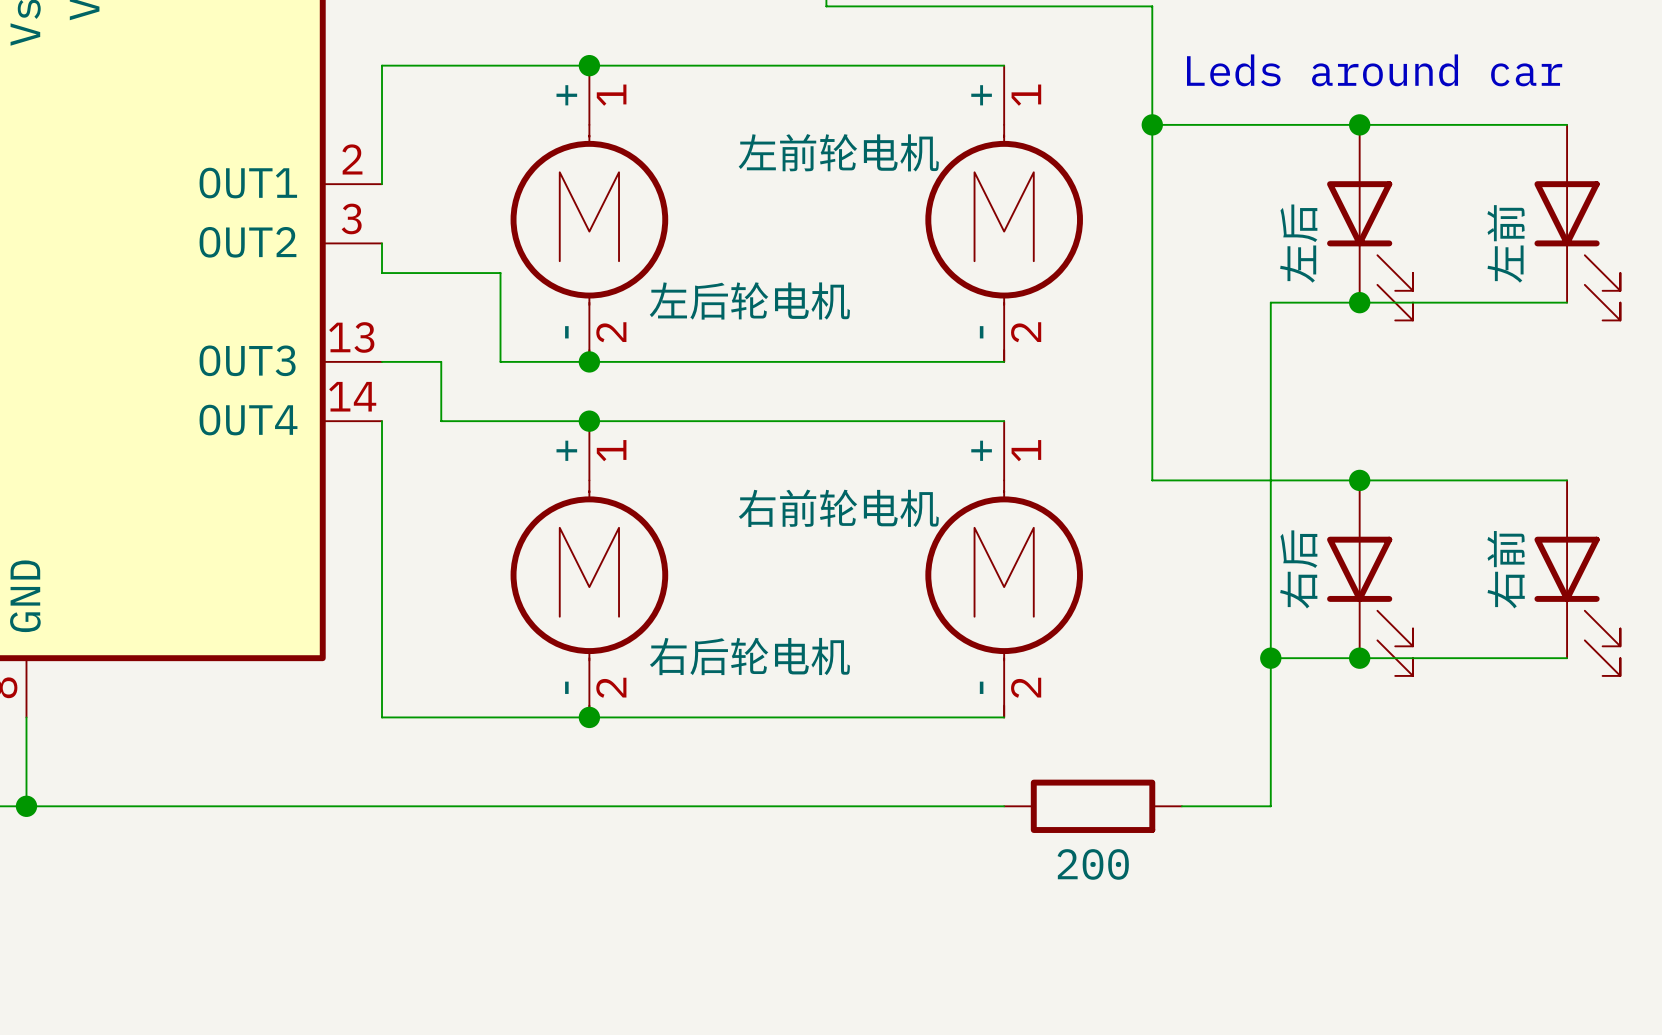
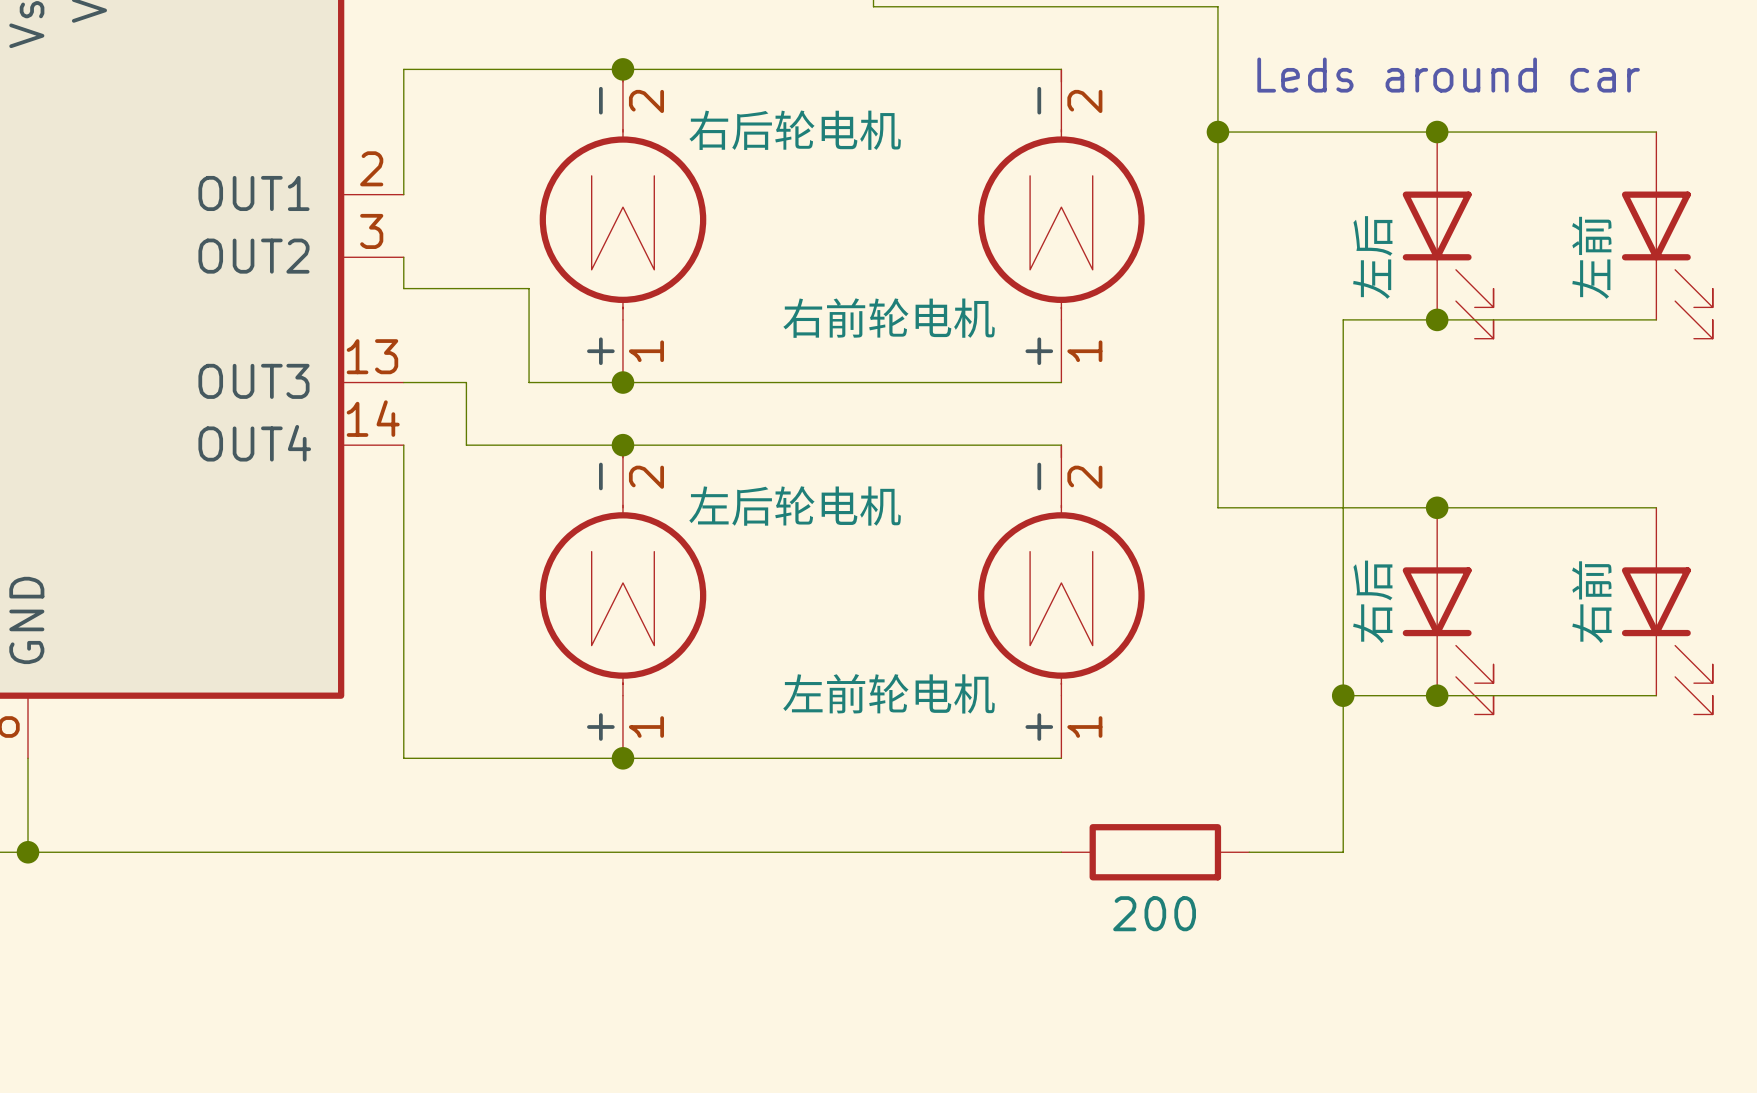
part value: 左前轮电机 (838, 152) -> 右前轮电机 (889, 318)
part rotation: 0° (589, 243) -> 180° (622, 194)
part rotation: 0° (1004, 243) -> 180° (1061, 194)
part value: 左后轮电机 (749, 300) -> 右后轮电机 (795, 130)
part value: 右前轮电机 (838, 508) -> 左前轮电机 (888, 693)
part rotation: 0° (589, 598) -> 180° (622, 570)
part rotation: 0° (1004, 598) -> 180° (1061, 570)
part value: 右后轮电机 (749, 656) -> 左后轮电机 (795, 506)

